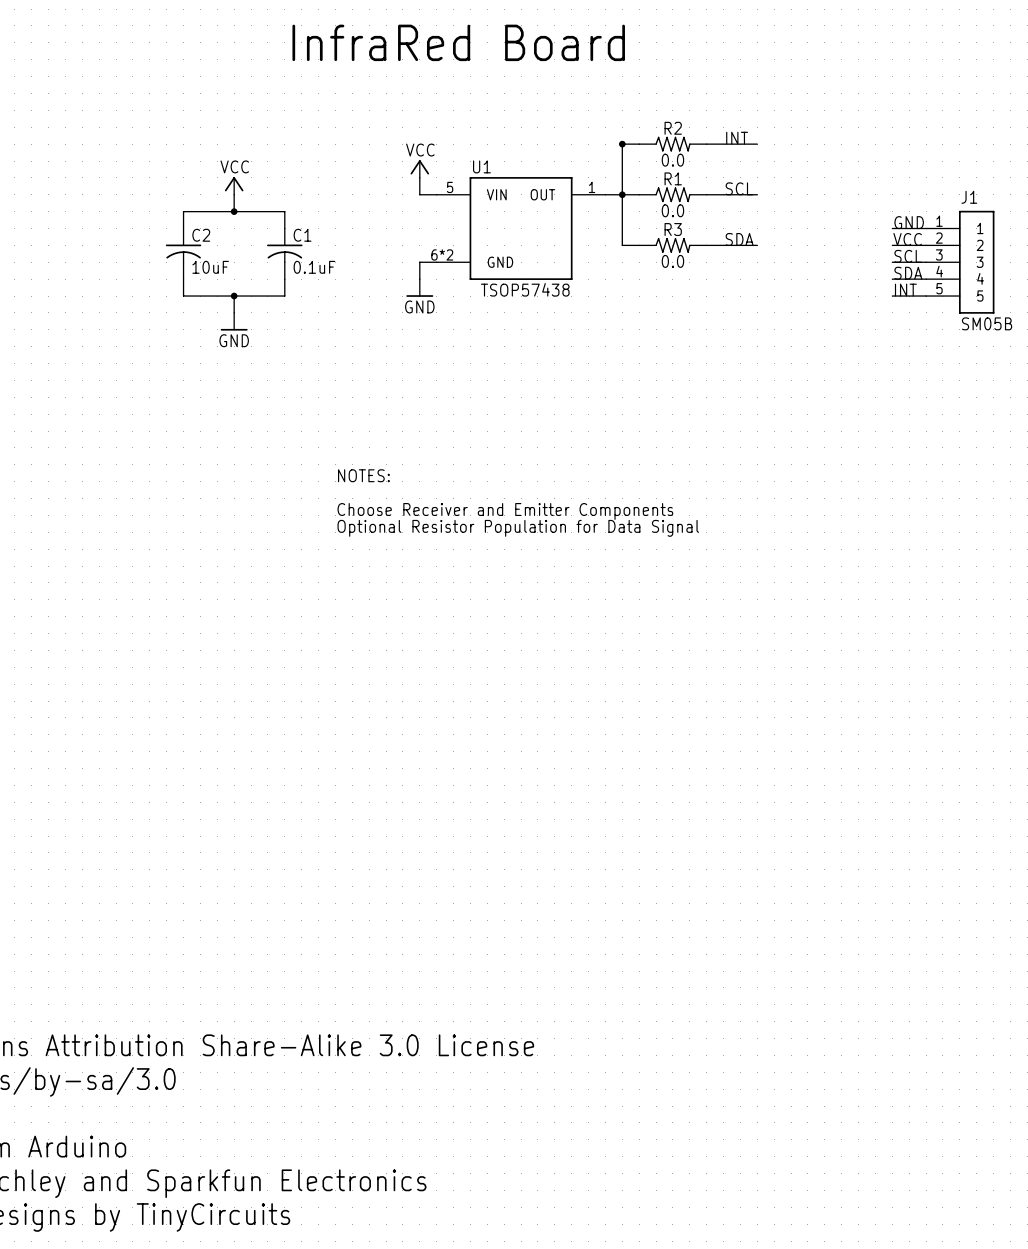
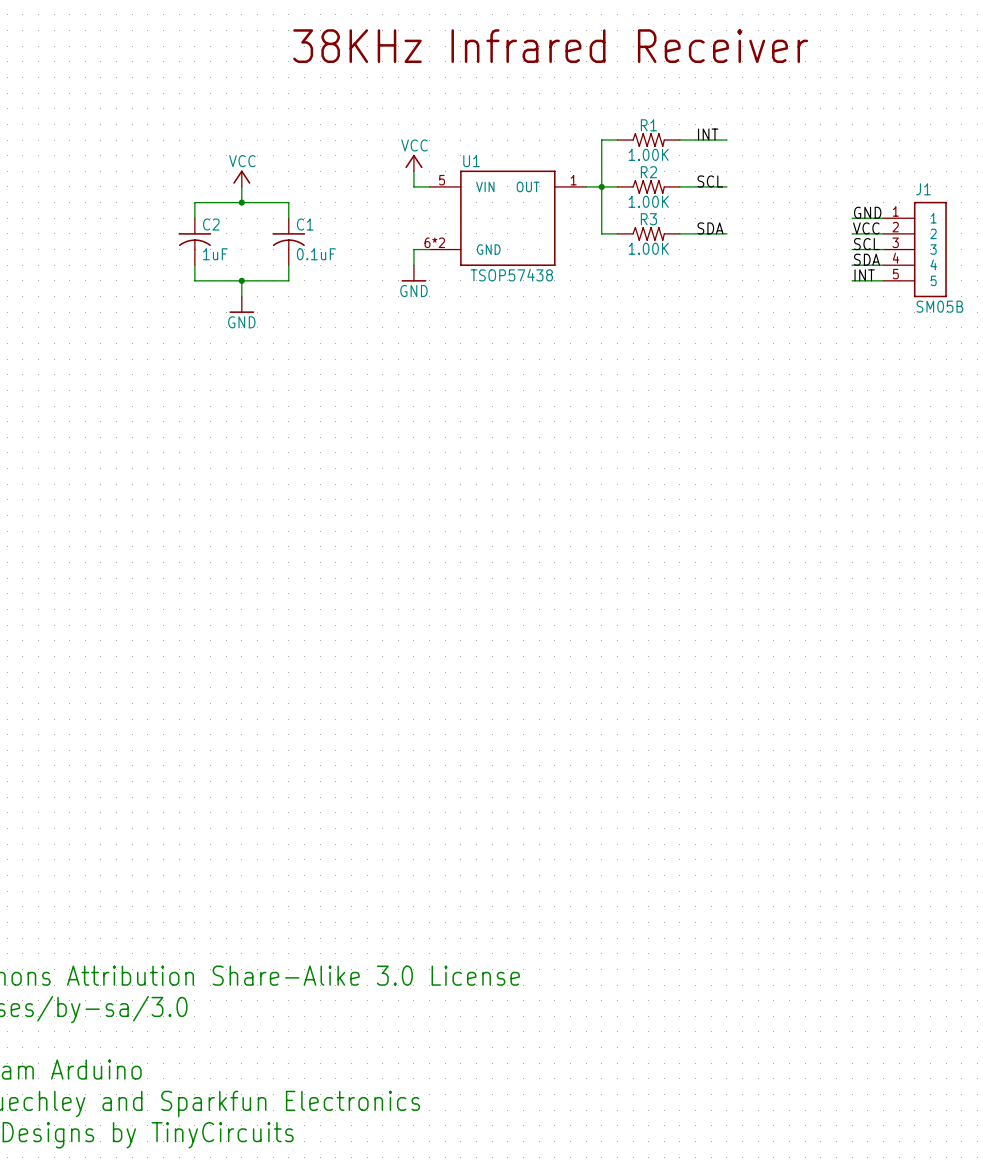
text: InfraRed Board (458, 42) -> 38KHz Infrared Receiver (550, 46)
R2 name: R2 (673, 128) -> R1 (648, 125)
junction: (622, 144) -> none
R2 value: 0.0 (672, 160) -> 1.00K (648, 154)
R1 name: R1 (673, 178) -> R2 (648, 172)
R1 value: 0.0 (672, 210) -> 1.00K (648, 201)
R3 value: 0.0 (672, 261) -> 1.00K (648, 248)
C2 value: 10uF (210, 267) -> 1uF (215, 254)
text: NOTES: (363, 475) -> none
text: Choose Receiver and Emitter Components (505, 511) -> none
text: Optional Resistor Population for Data Signal (518, 528) -> none

